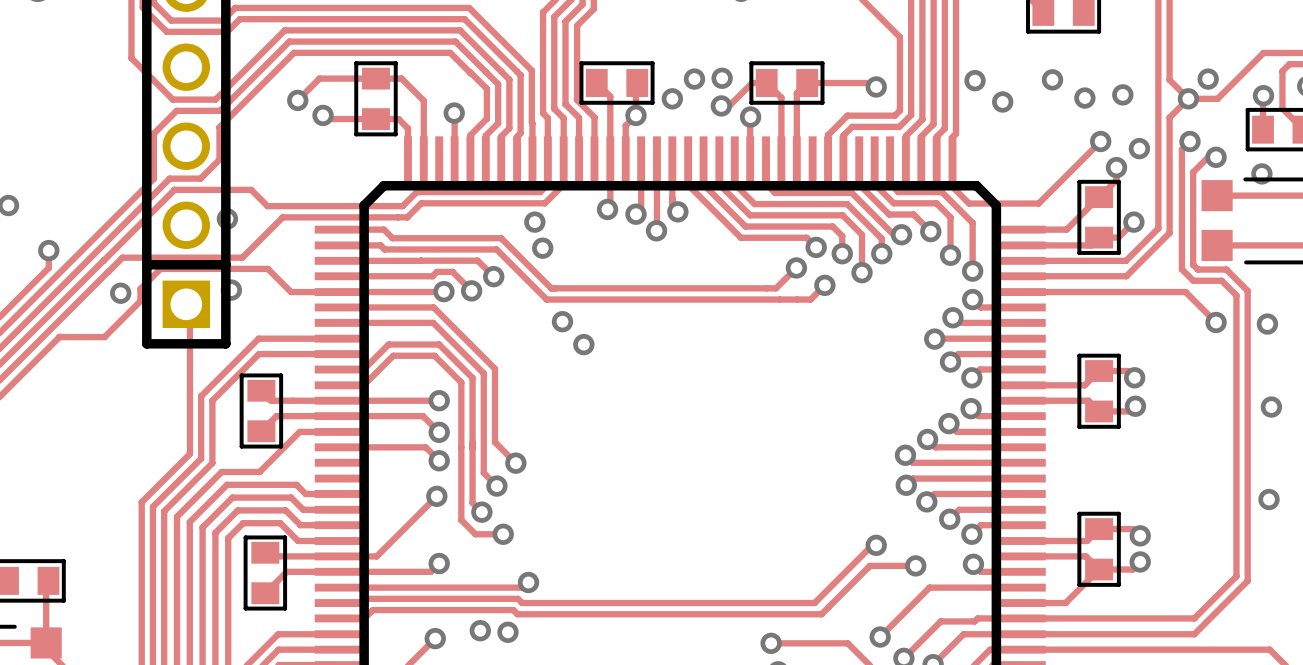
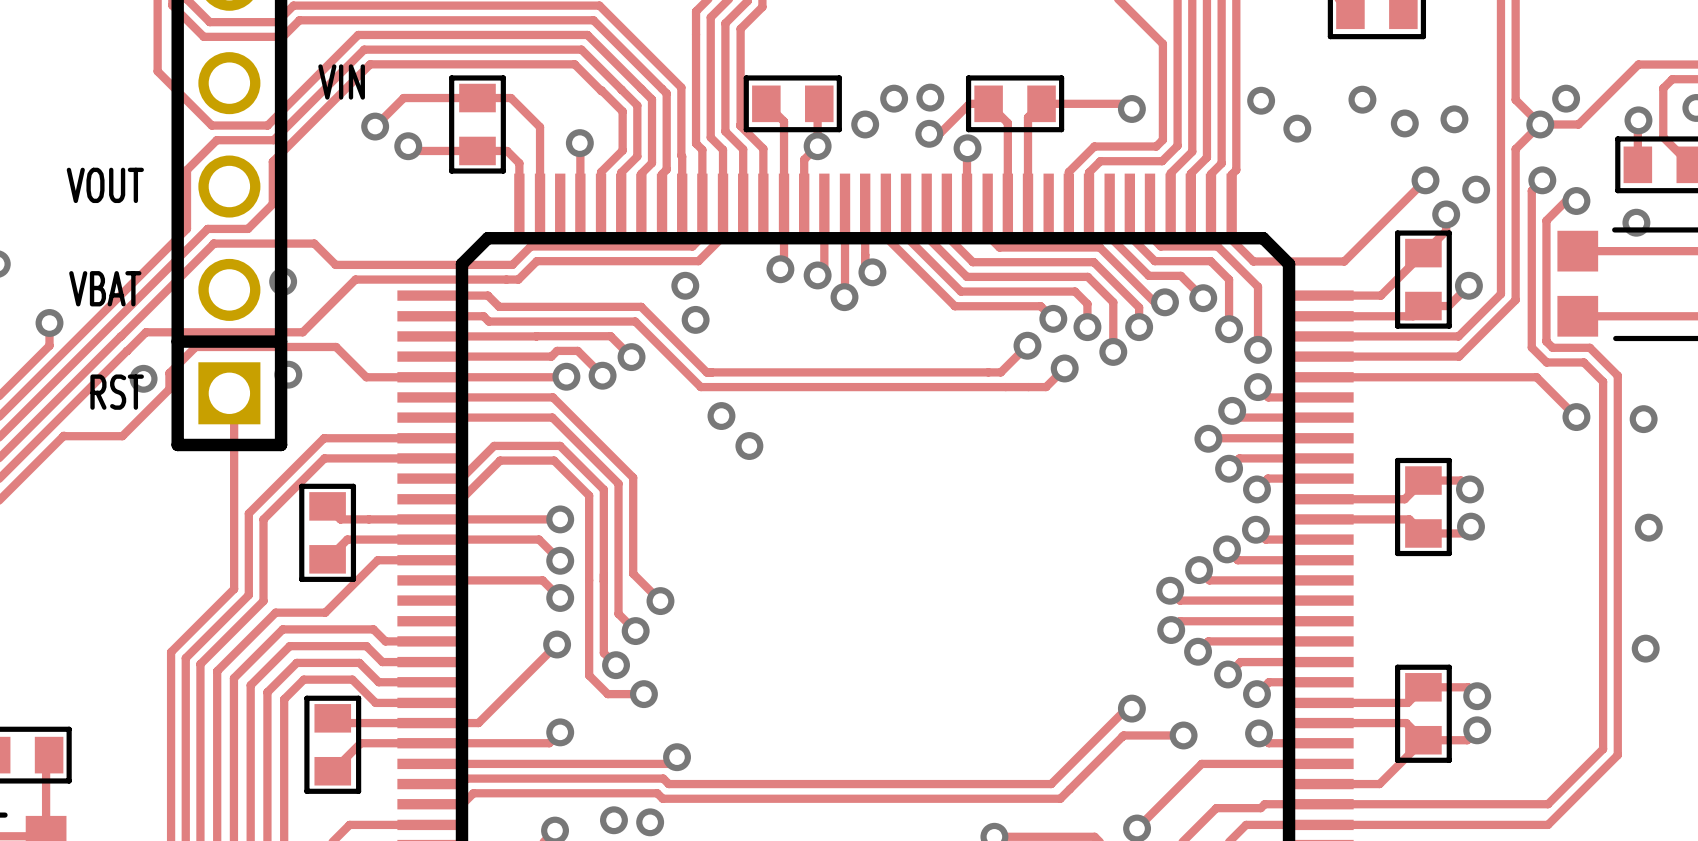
text: none -> VIN (341, 81)
text: none -> VOUT (105, 185)
text: none -> VBAT (105, 288)
text: none -> RST (117, 392)

